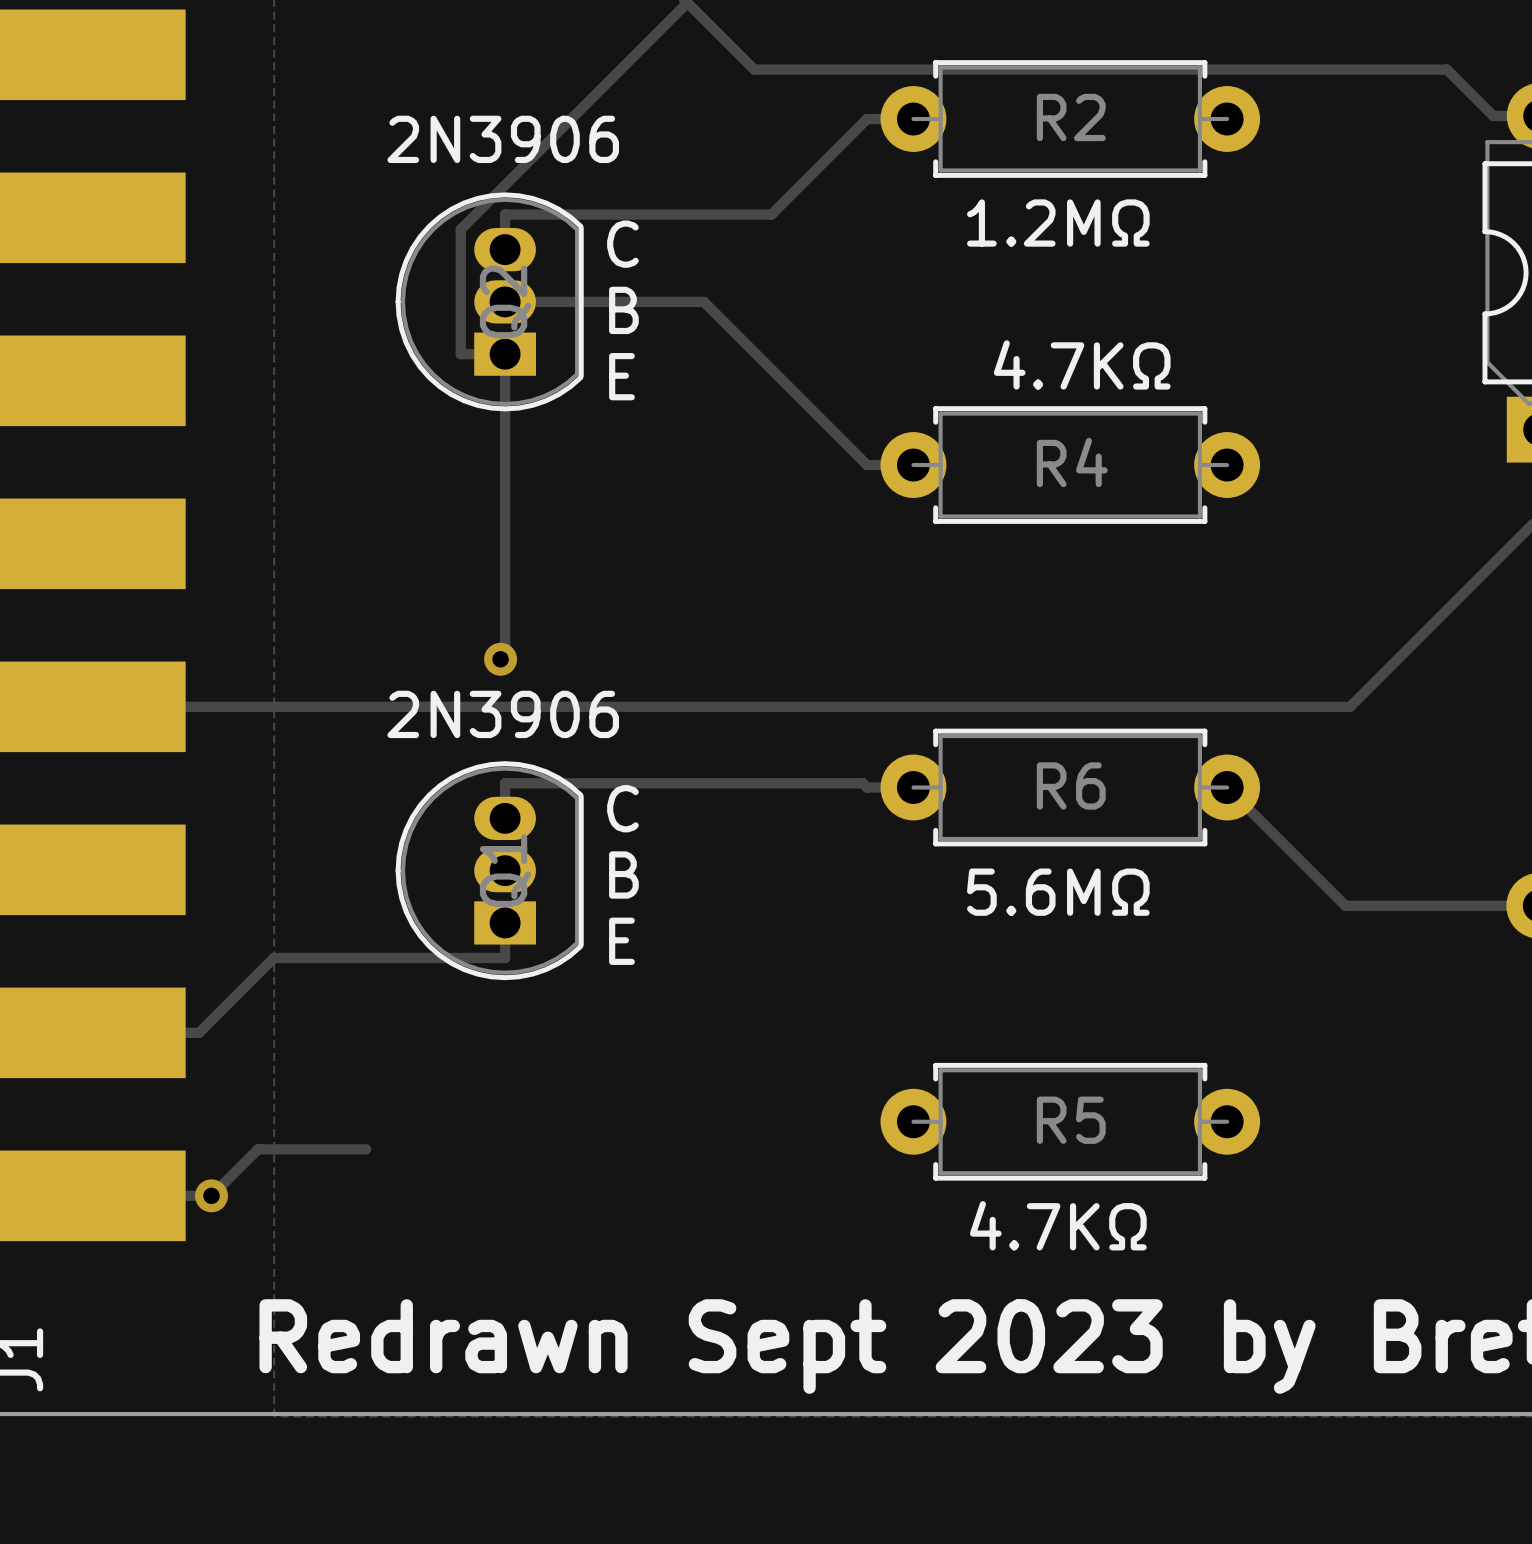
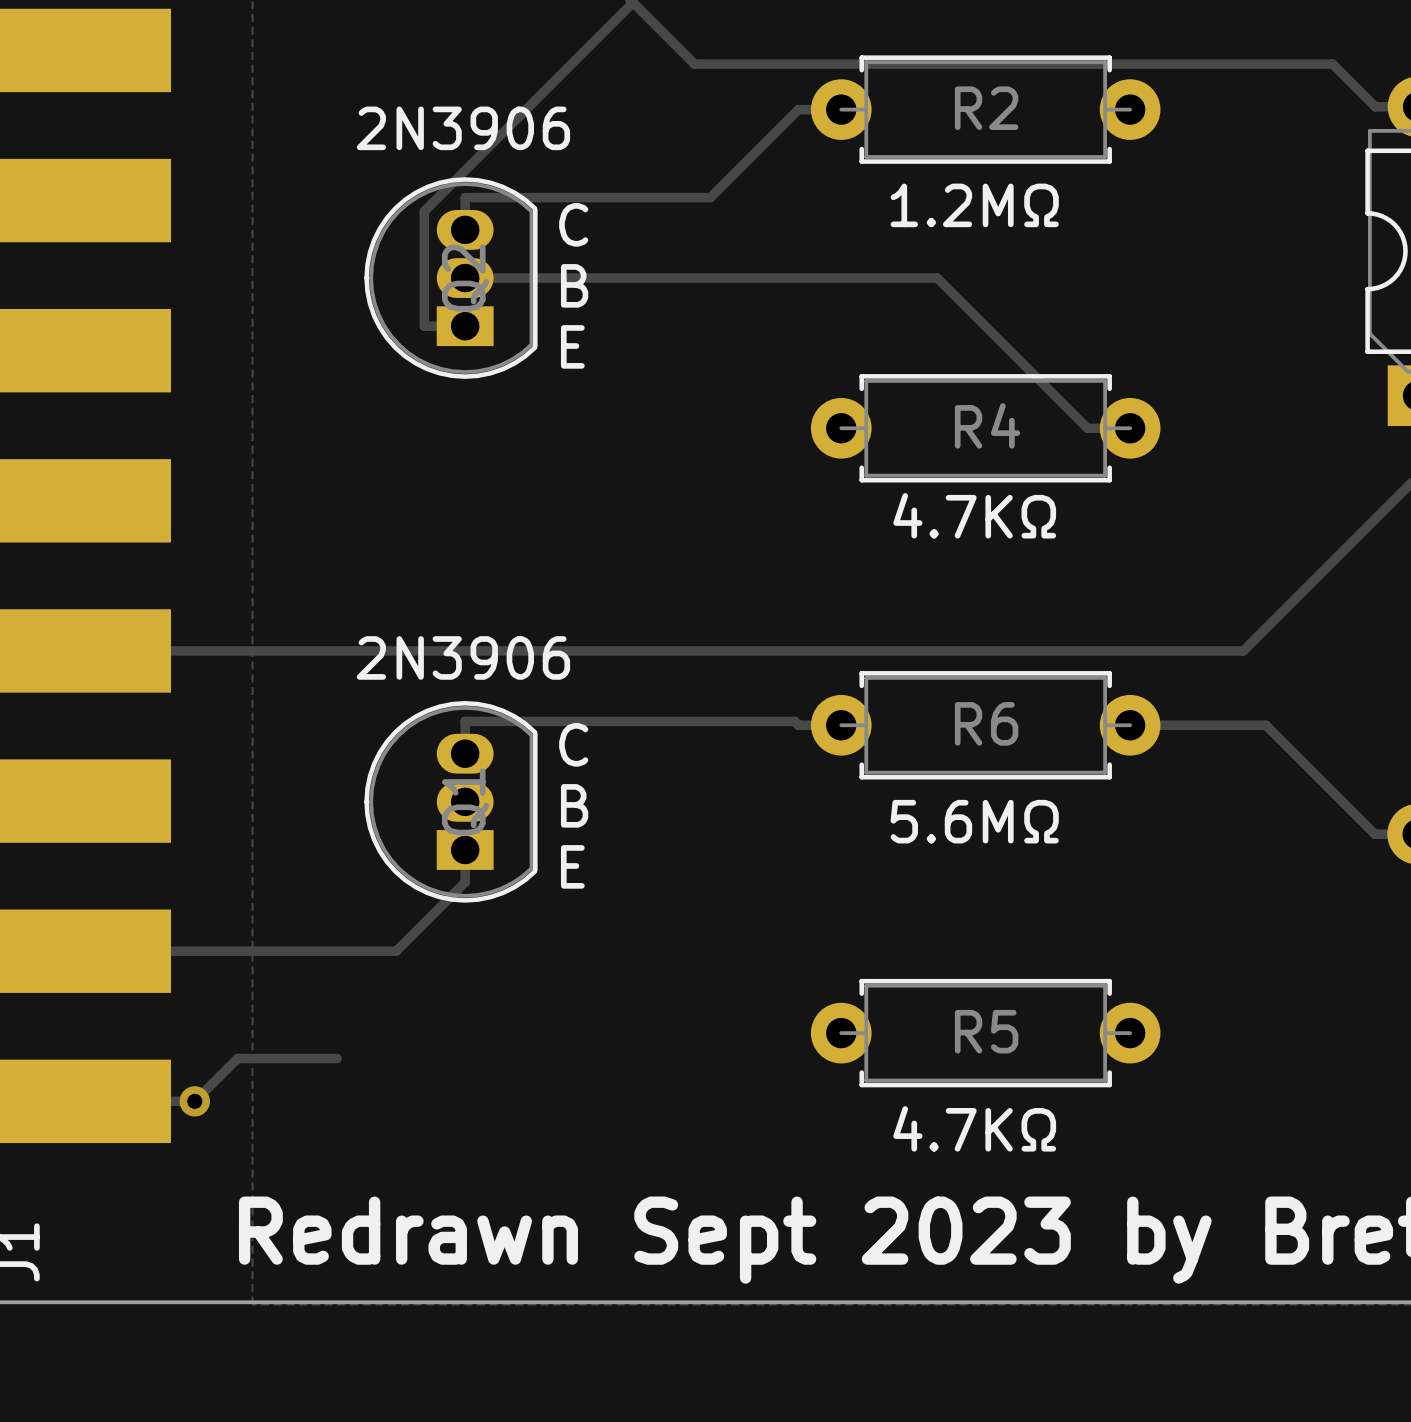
track: (703, 301) (867, 465) (913, 465) -> (648, 278) (937, 278) (1087, 428) (1130, 428)
track: (505, 354) (505, 654) (500, 659) -> none
R4 value position: 4.7KΩ (1082, 364) -> 4.7KΩ (974, 515)
via: (500, 659) -> none
track: (1227, 787) (1345, 905) (1492, 905) -> (1130, 725) (1266, 725) (1374, 834)
track: (505, 958) (273, 958) (199, 1032) -> (465, 882) (396, 951) (183, 951)

